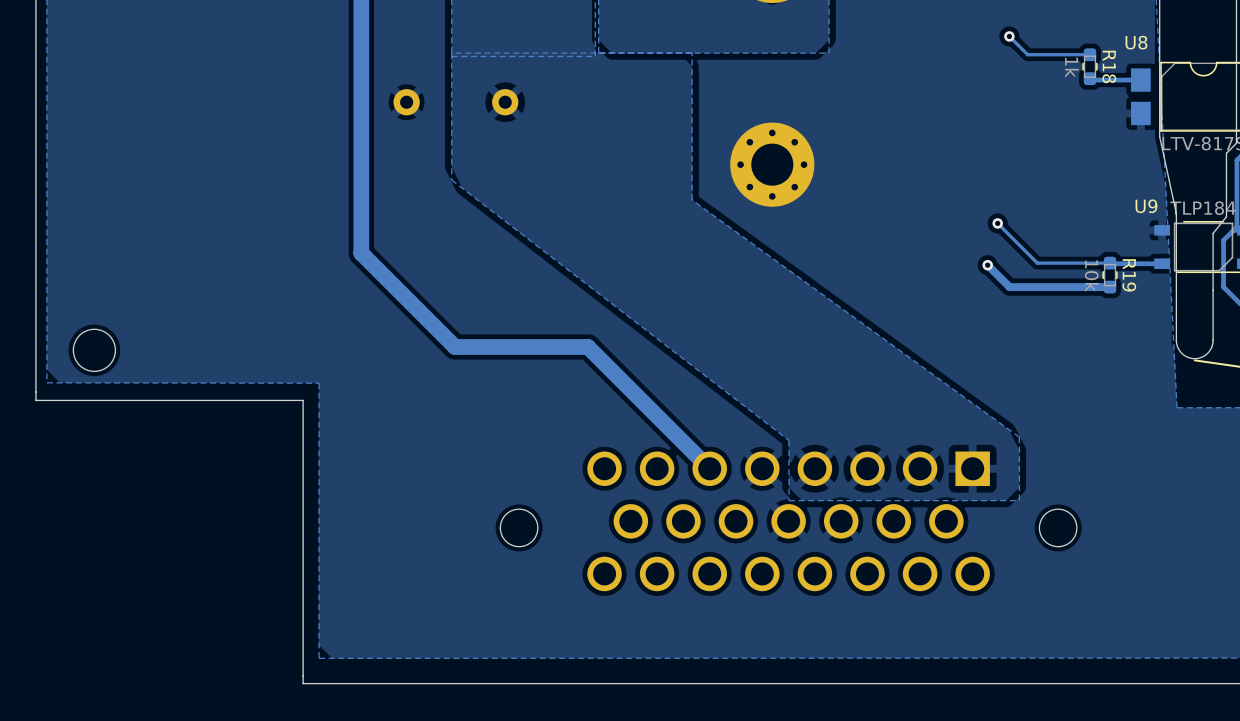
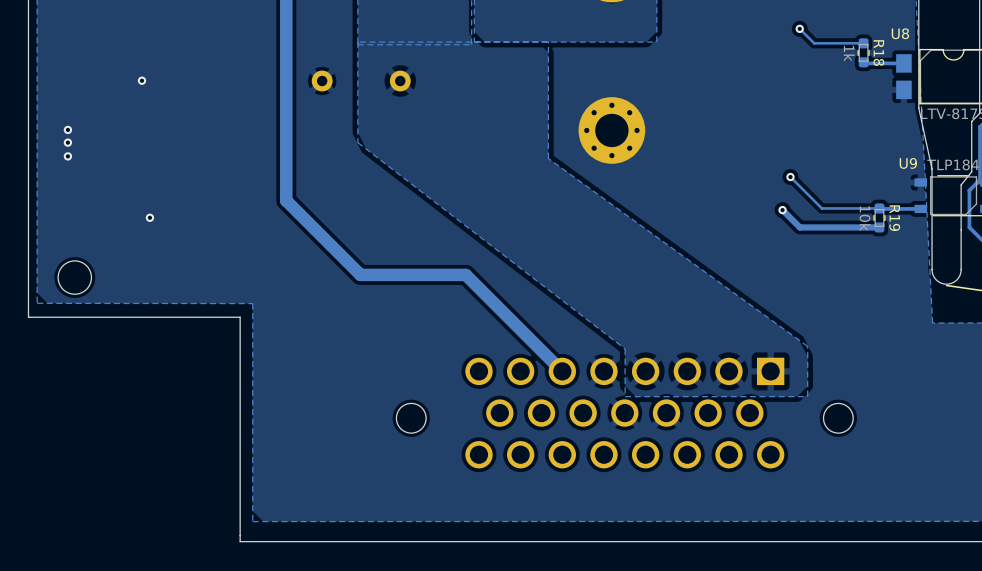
via: none -> (141, 80)
via: none -> (67, 129)
via: none -> (67, 142)
via: none -> (67, 156)
via: none -> (149, 217)

